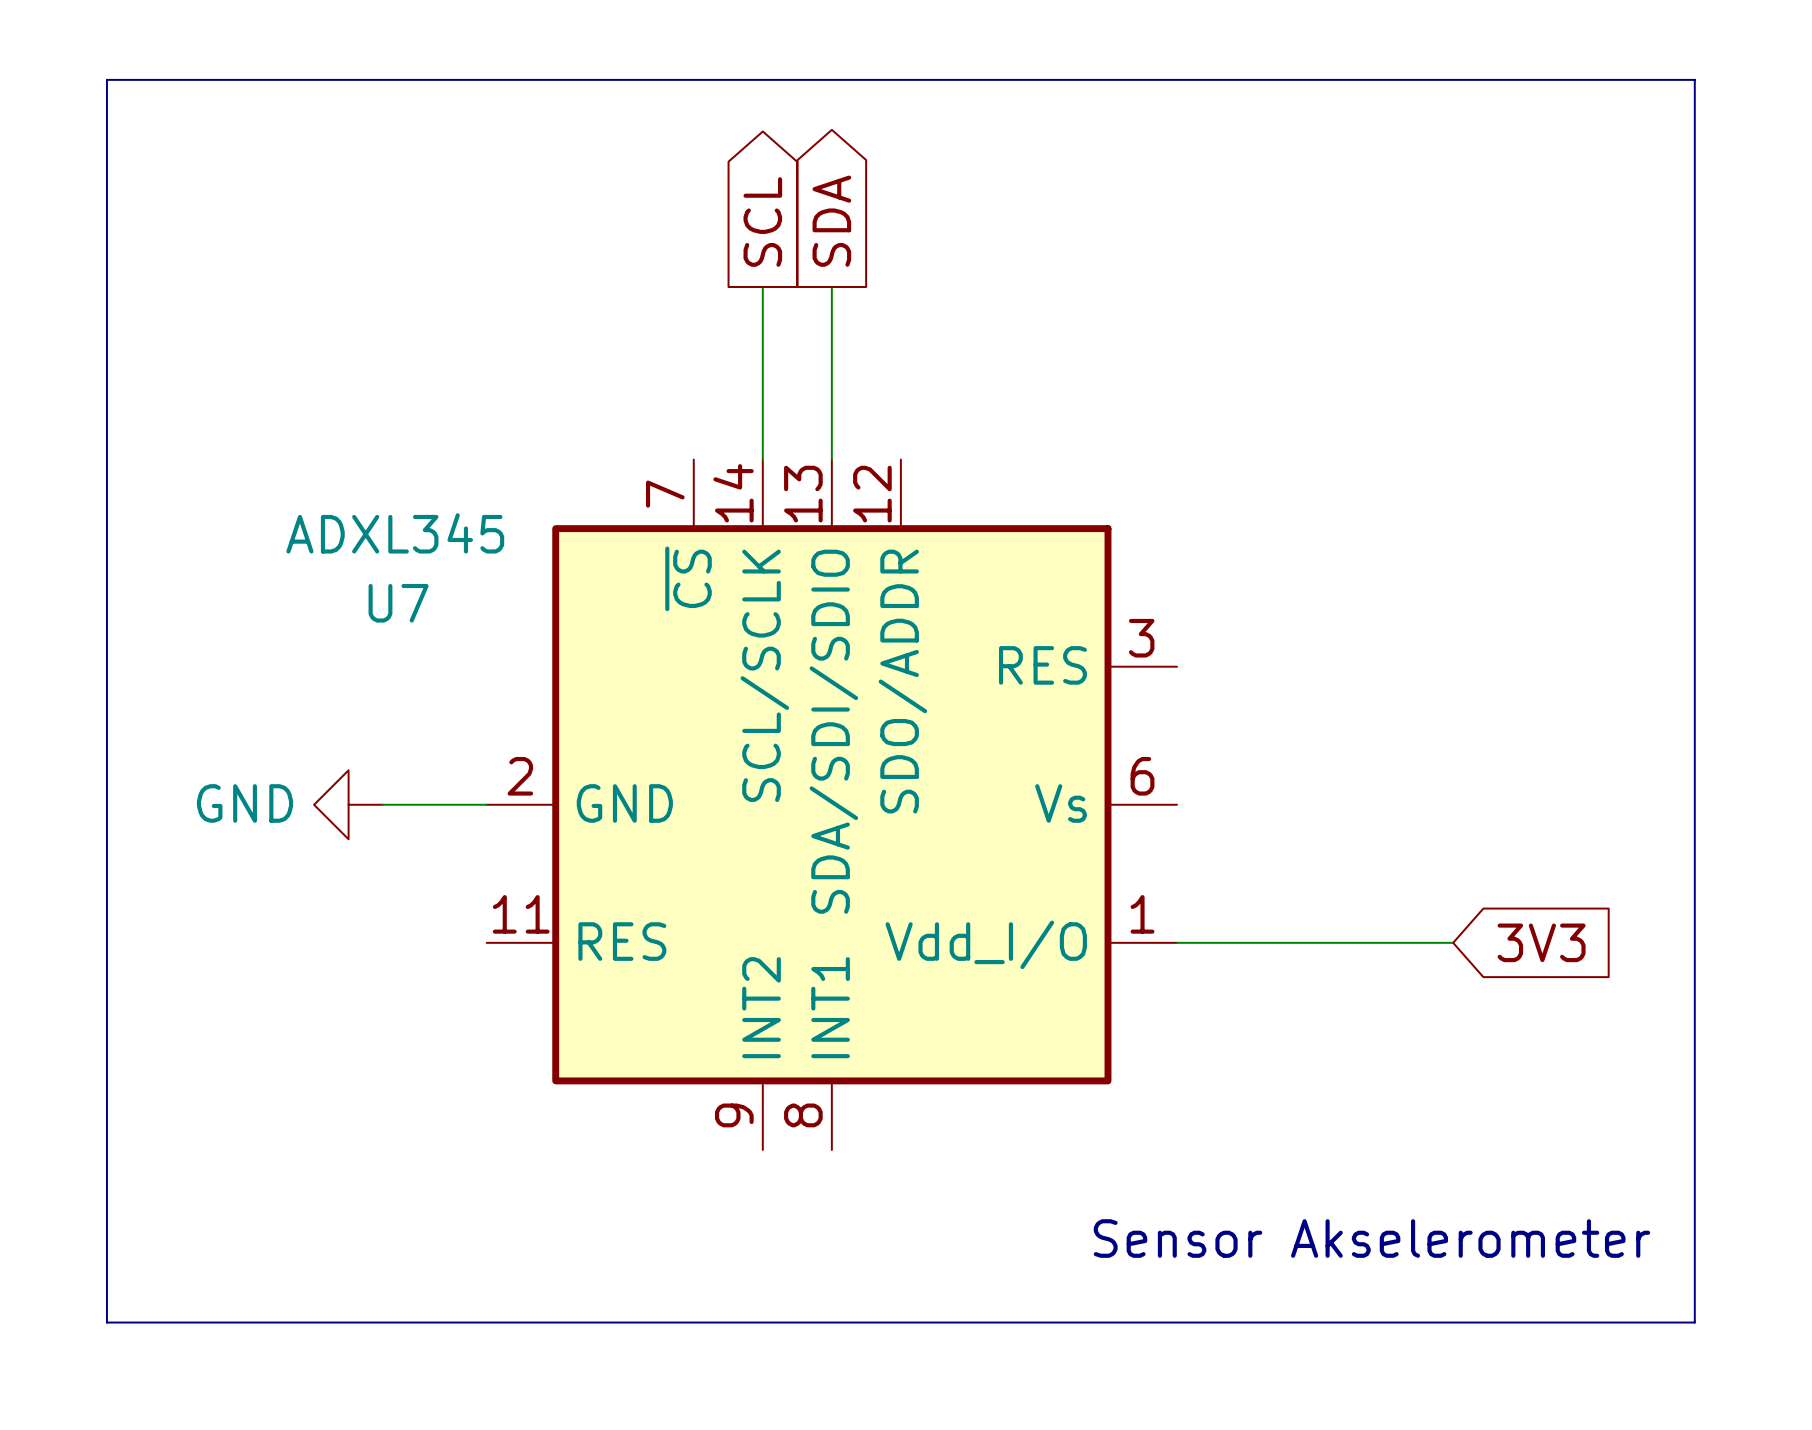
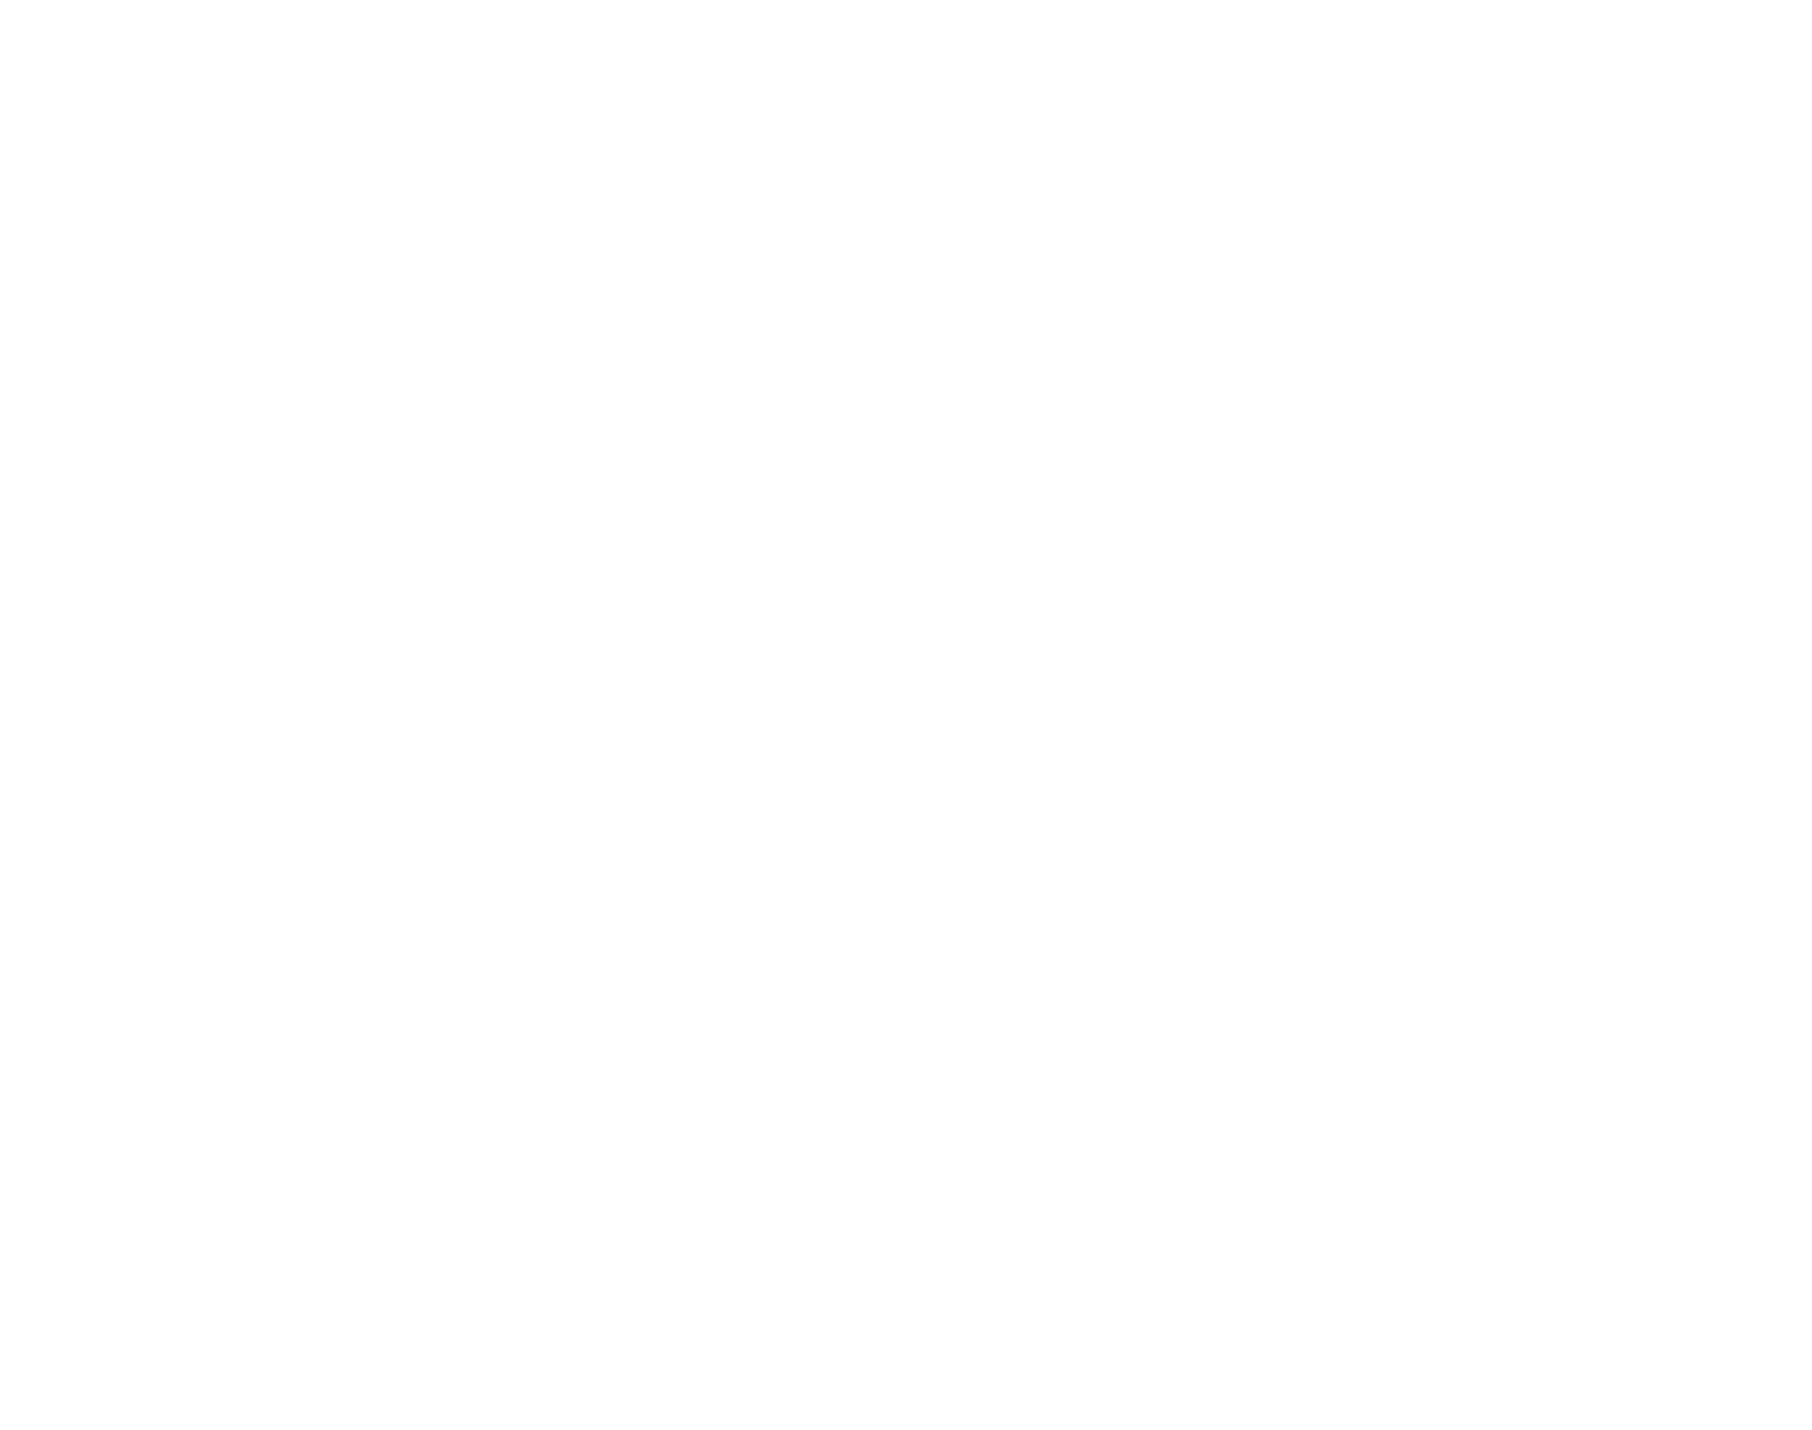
line: (106, 79) (1694, 79) (1694, 1322) (106, 1322) (106, 79) -> none
global label: SDA (831, 221) -> none
global label: SCL (762, 222) -> none
wire: (762, 286) (762, 459) -> none
wire: (831, 286) (831, 459) -> none
power symbol: GND (348, 804) -> none
wire: (383, 804) (486, 804) -> none
U7: ADXL345 (831, 804) -> none
wire: (1177, 942) (1453, 942) -> none
global label: 3V3 (1541, 942) -> none
text: Sensor Akselerometer (1371, 1238) -> none

